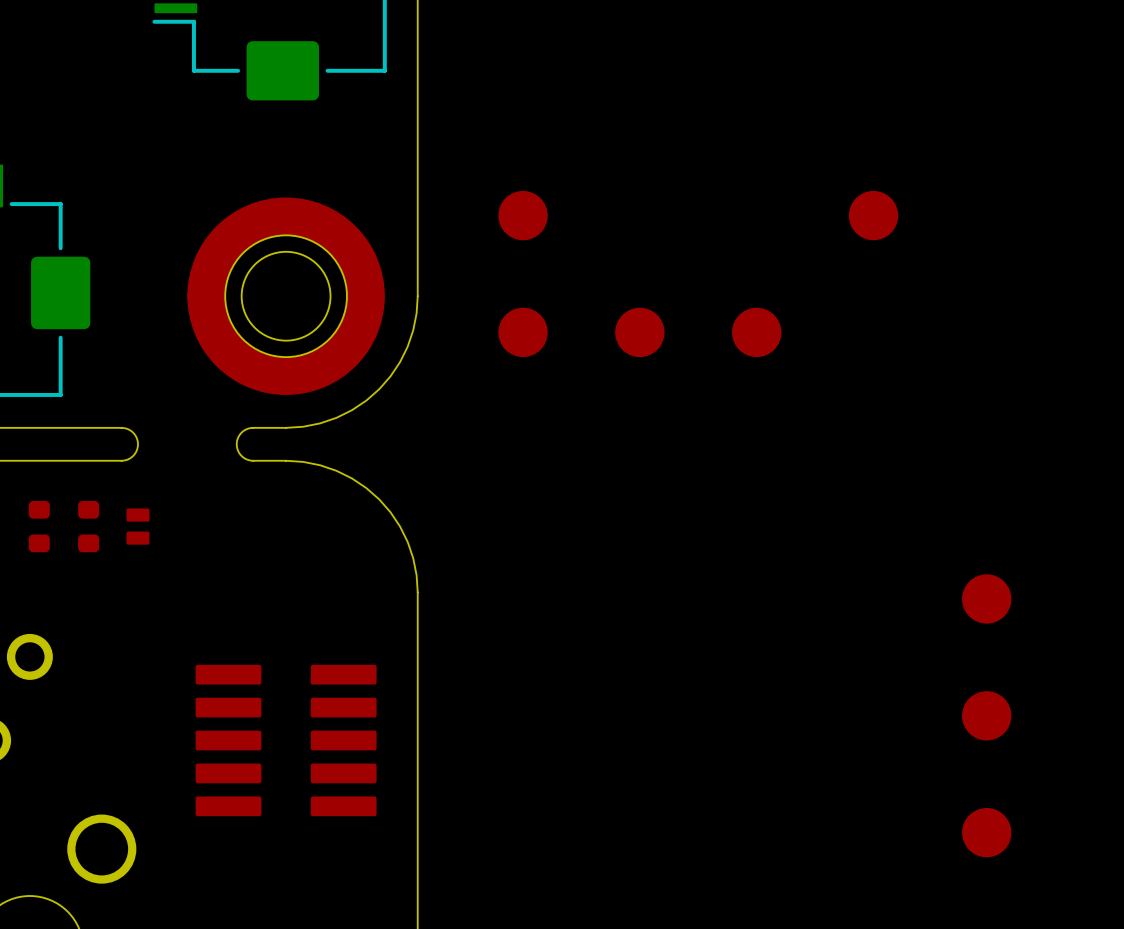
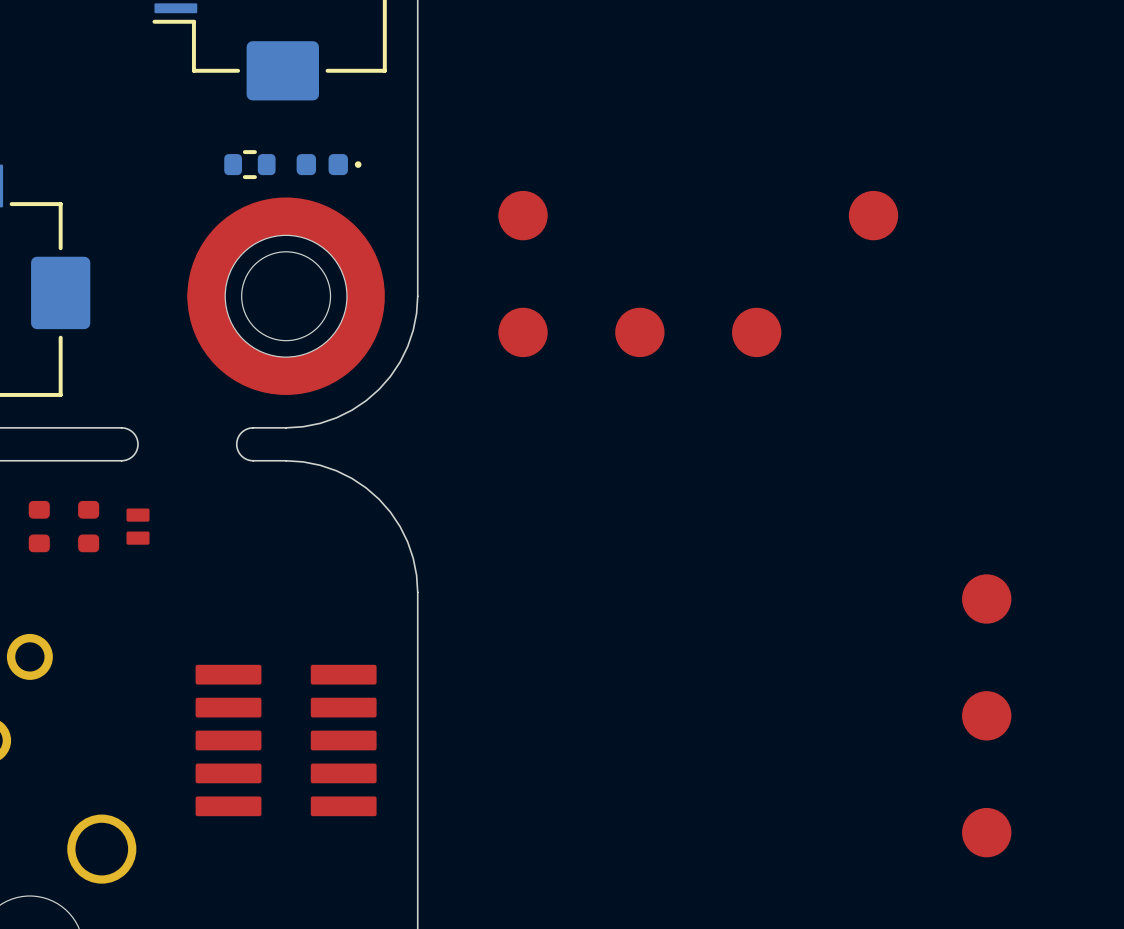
part: none -> (249, 164)
part: none -> (329, 164)

